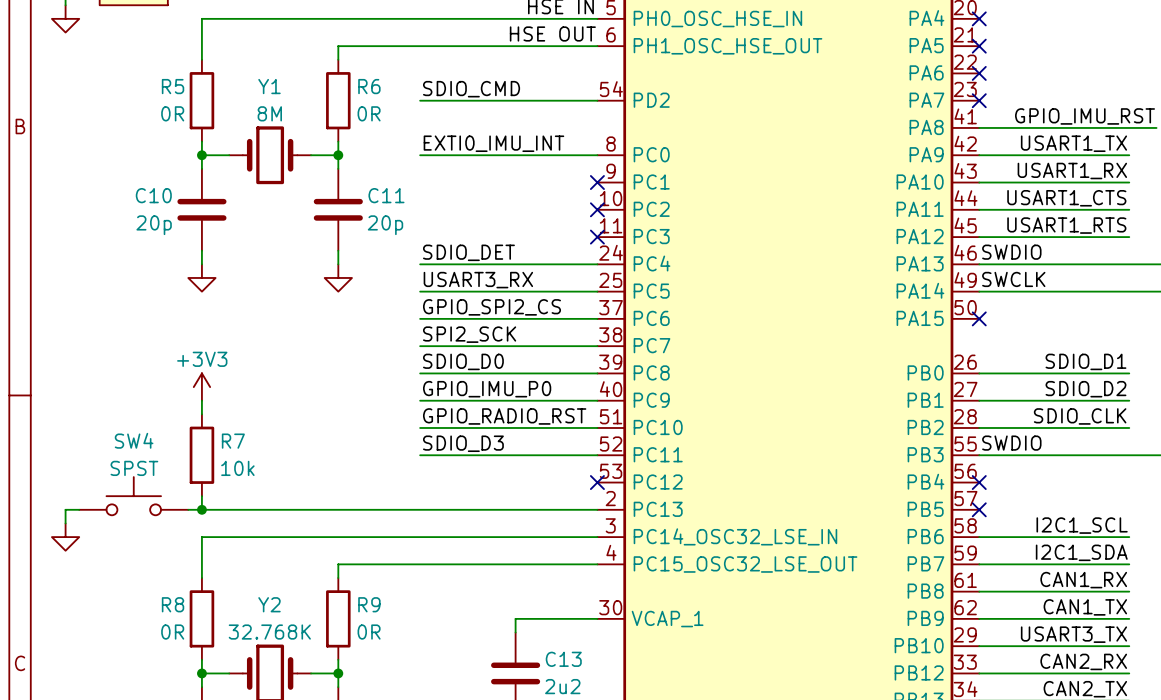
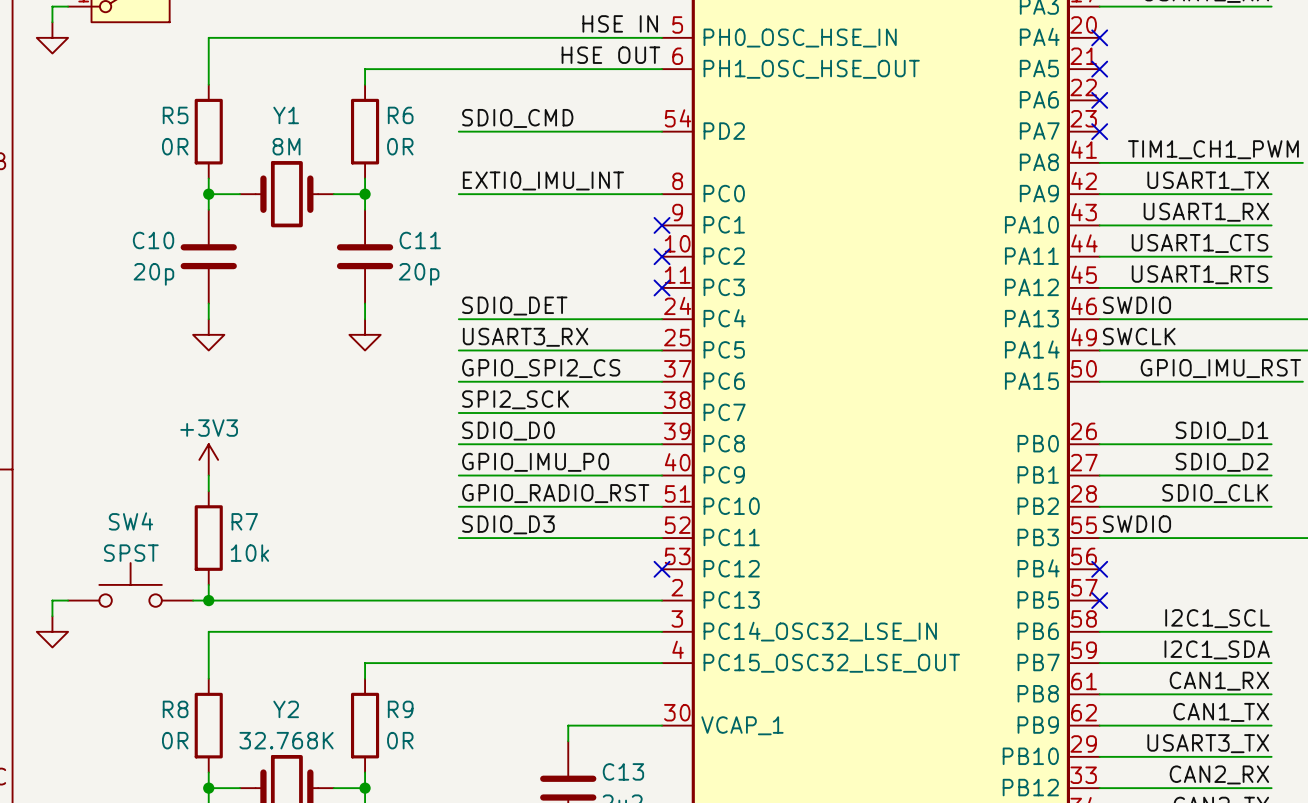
label: GPIO_IMU_RST (1085, 116) -> TIM1_CH1_PWM (1213, 149)
label: none -> GPIO_IMU_RST (1220, 368)
wire: none -> (1099, 381) (1302, 381)
no-connect mark: (979, 318) -> none

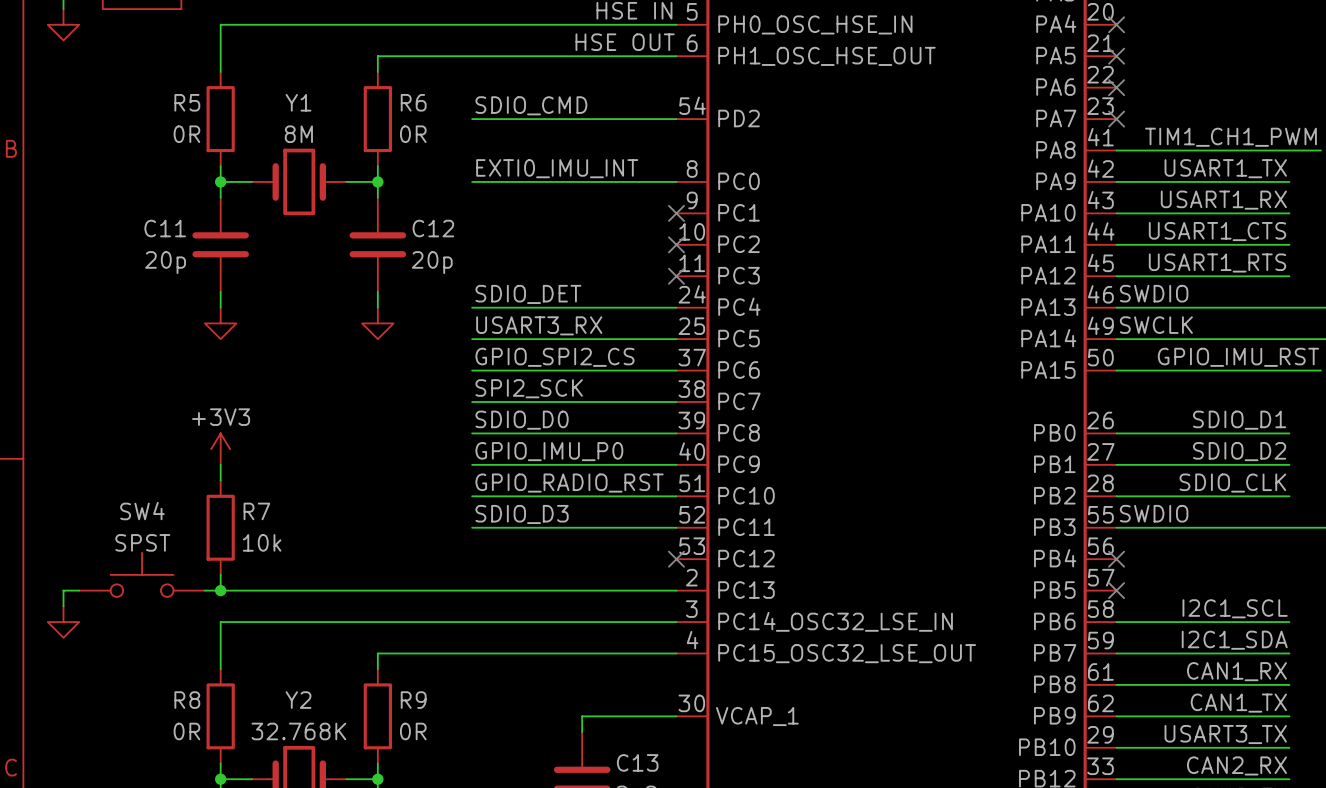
C10 name: C10 (153, 240) -> C11 (165, 228)
C11 name: C11 (420, 240) -> C12 (433, 228)

